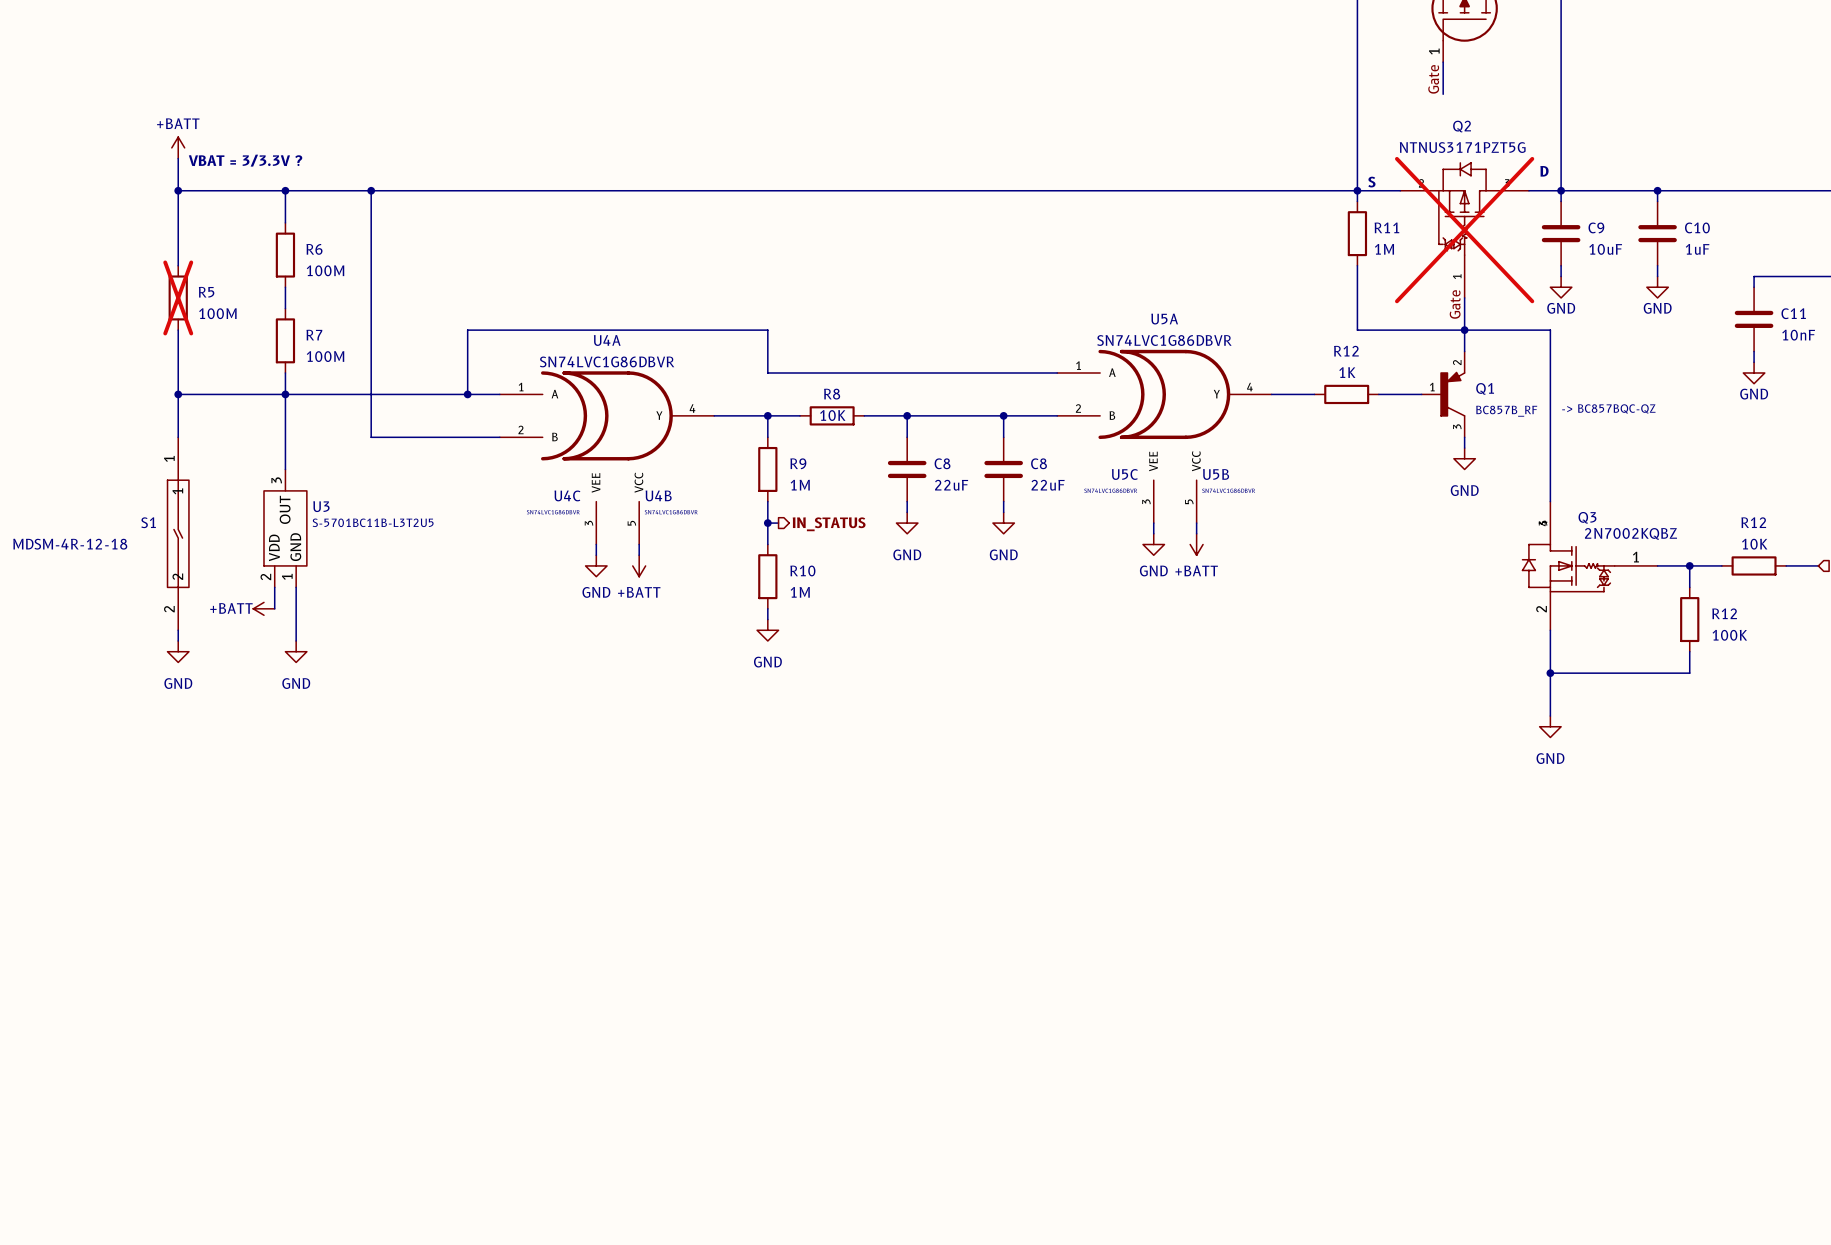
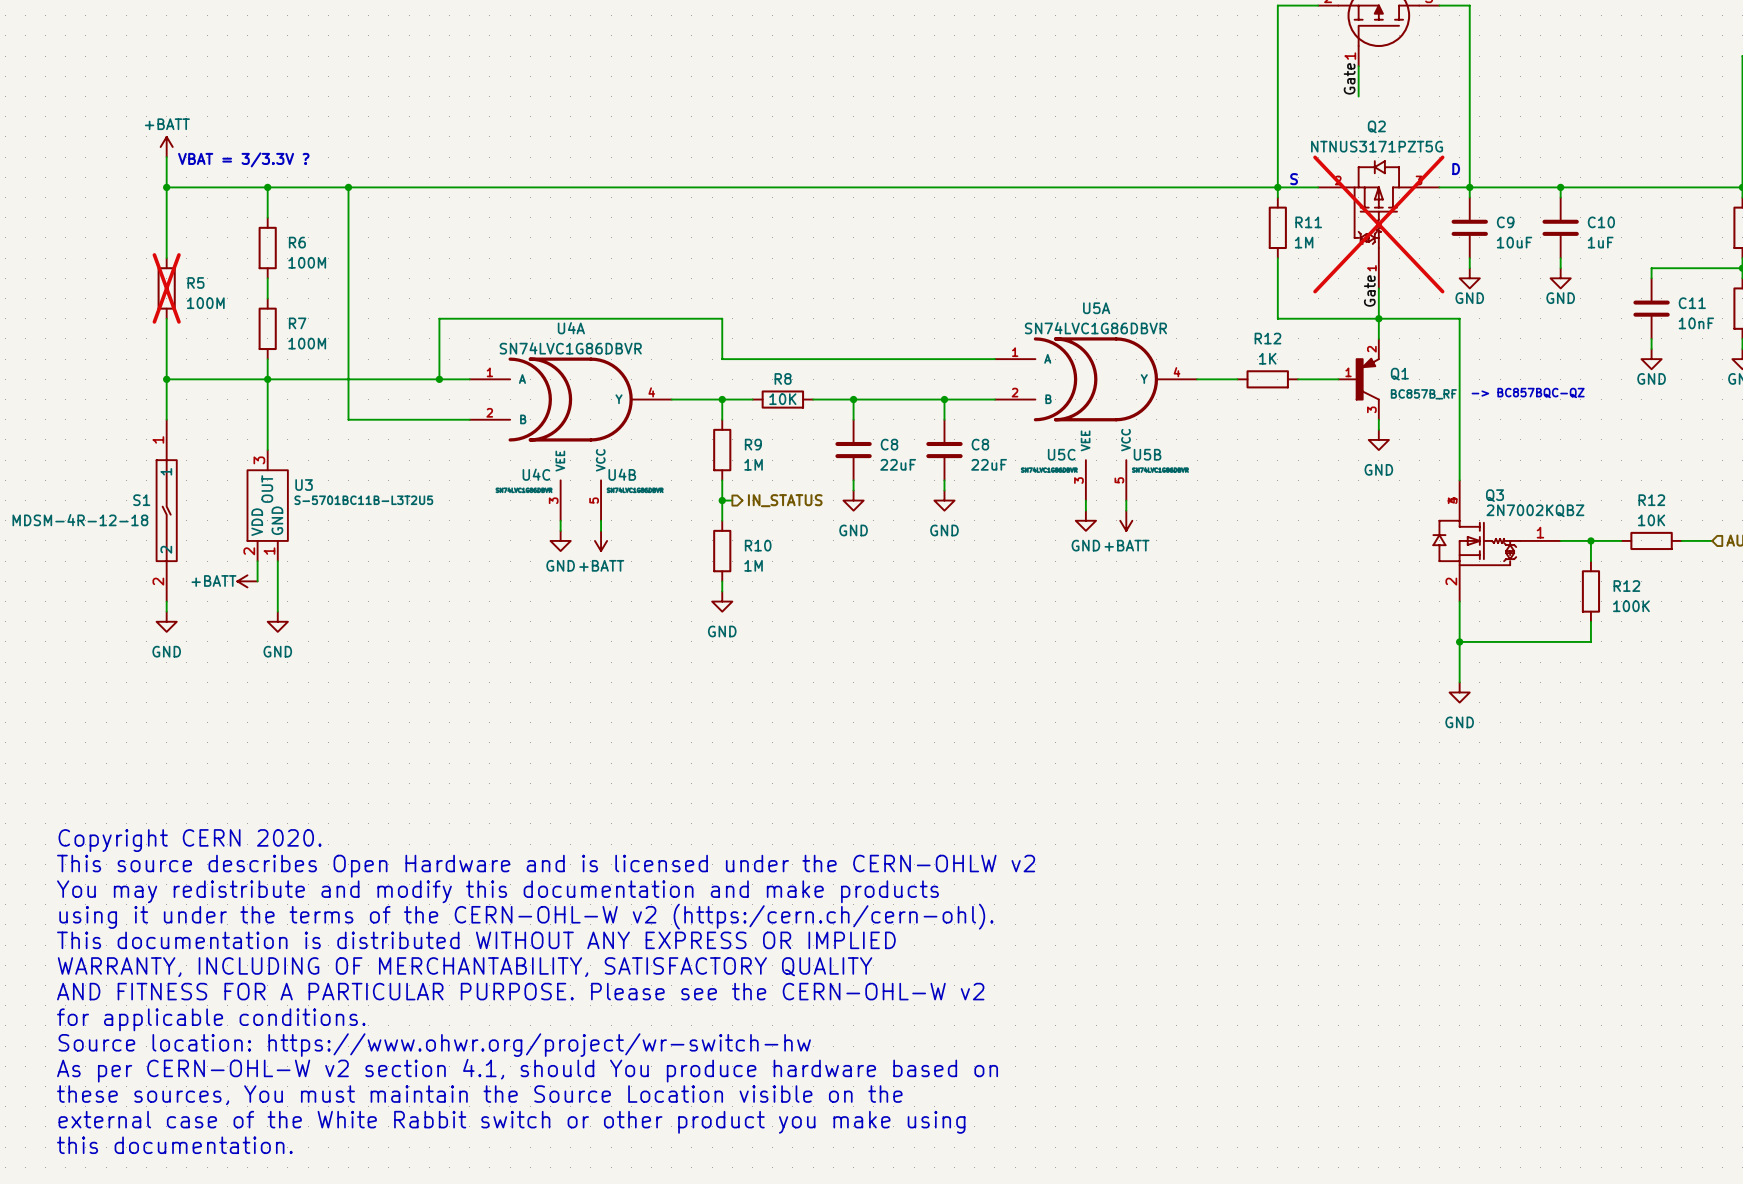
text: none -> Copyright CERN 2020. (190, 840)
text: none -> This source describes Open Hardware and is licensed under the CERN-OHLW v2 (546, 866)
text: none -> You may redistribute and modify this documentation and make products (497, 891)
text: none -> using it under the terms of the CERN-OHL-W v2 (https:/cern.ch/cern-ohl). (526, 916)
text: none -> This documentation is distributed WITHOUT ANY EXPRESS OR IMPLIED (476, 940)
text: none -> WARRANTY, INCLUDING OF MERCHANTABILITY, SATISFACTORY QUALITY (465, 967)
text: none -> AND FITNESS FOR A PARTICULAR PURPOSE. Please see the CERN-OHL-W v2 (520, 991)
text: none -> for applicable conditions. (211, 1019)
text: none -> Source location: https://www.ohwr.org/project/wr-switch-hw (434, 1045)
text: none -> As per CERN-OHL-W v2 section 4.1, should You produce hardware based on (527, 1070)
text: none -> these sources, You must maintain the Source Location visible on the (479, 1095)
text: none -> external case of the White Rabbit switch or other product you make using (512, 1122)
text: none -> this documentation. (174, 1145)

